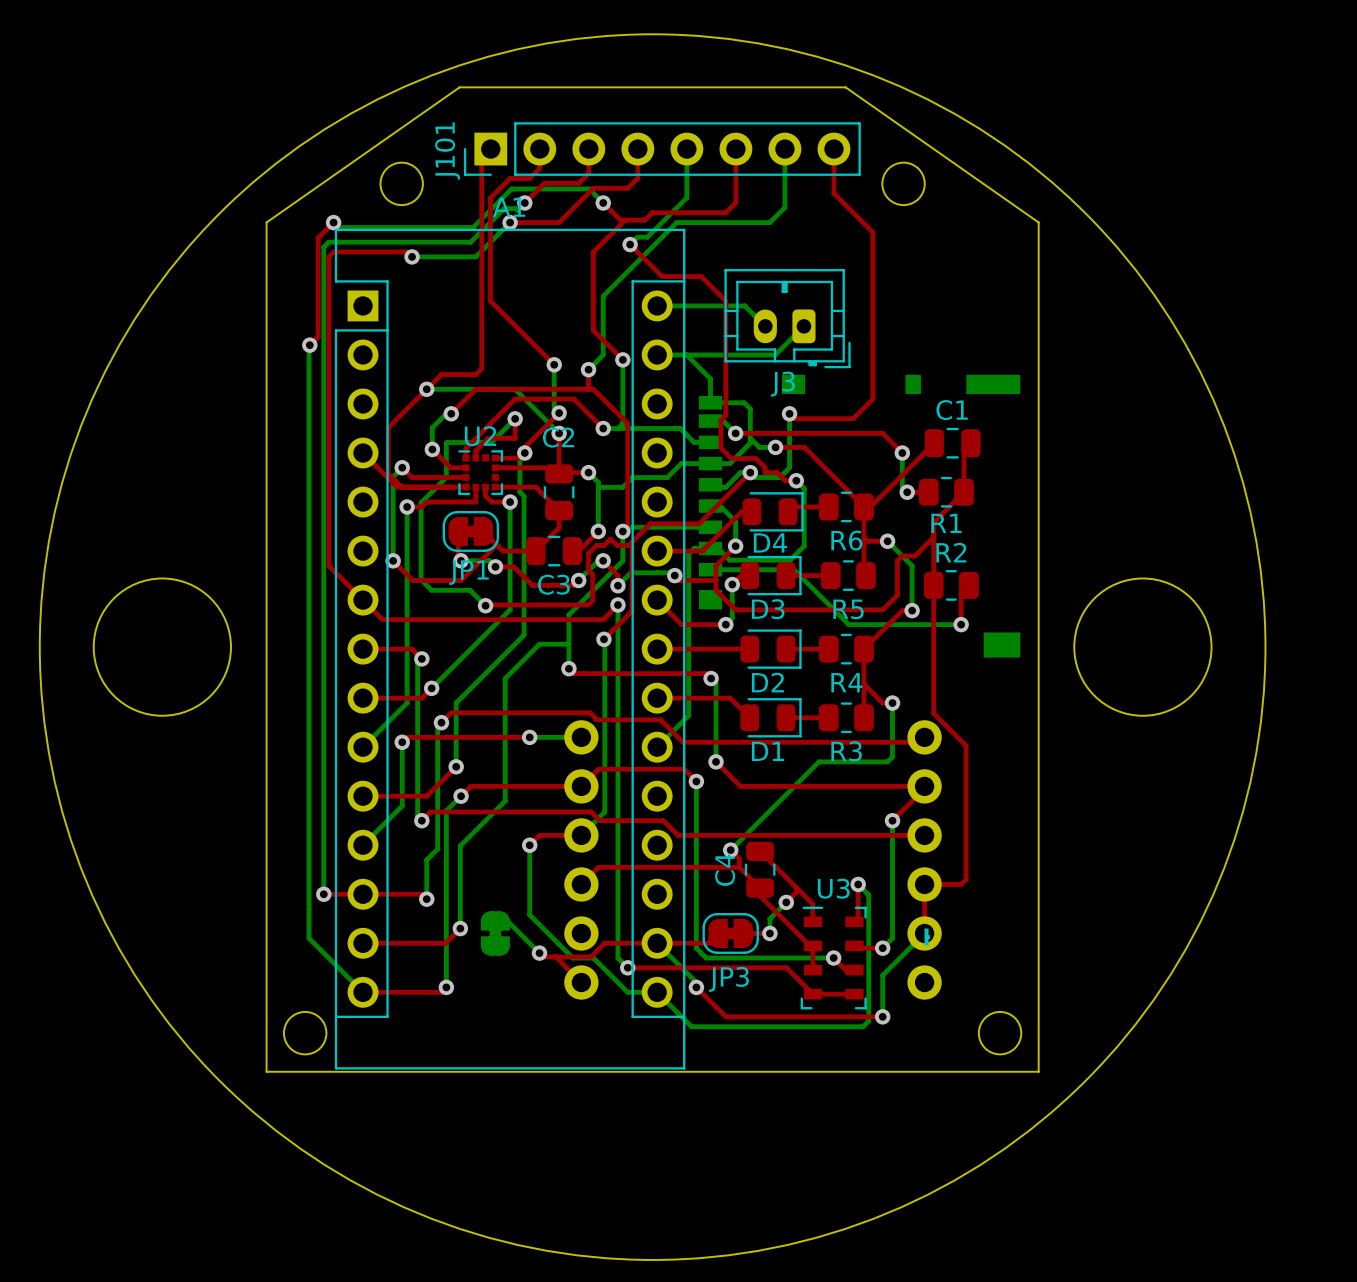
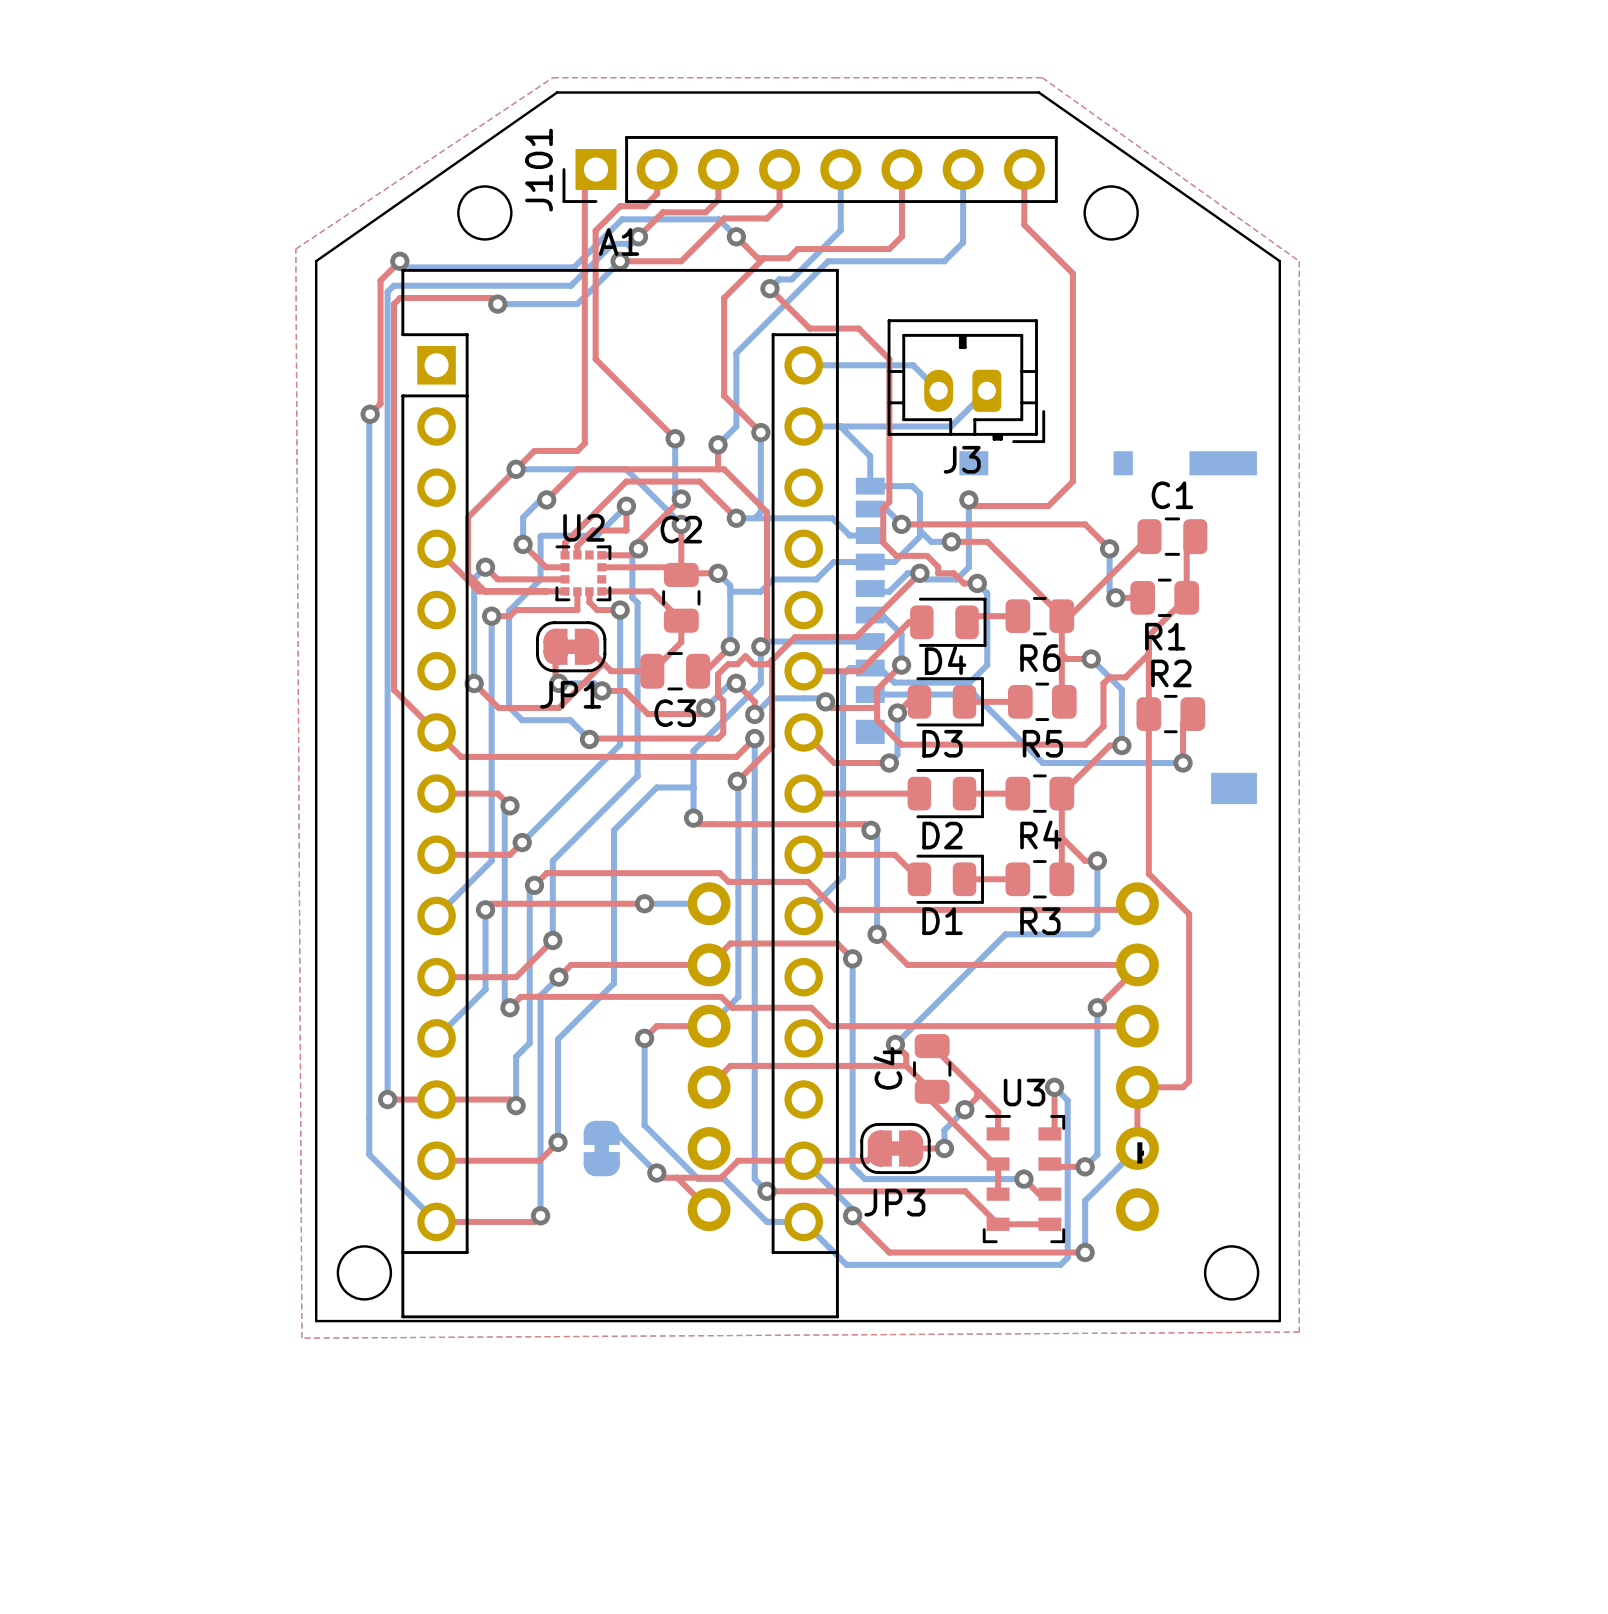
round board edge: [38, 33, 1267, 1261] -> none
top zone outline: none -> (552, 77) (295, 249) (301, 1338) (1299, 1332) (1299, 261) (1042, 77) (552, 77)
round board edge: [92, 577, 232, 717] -> none
round board edge: [1073, 577, 1213, 717] -> none

